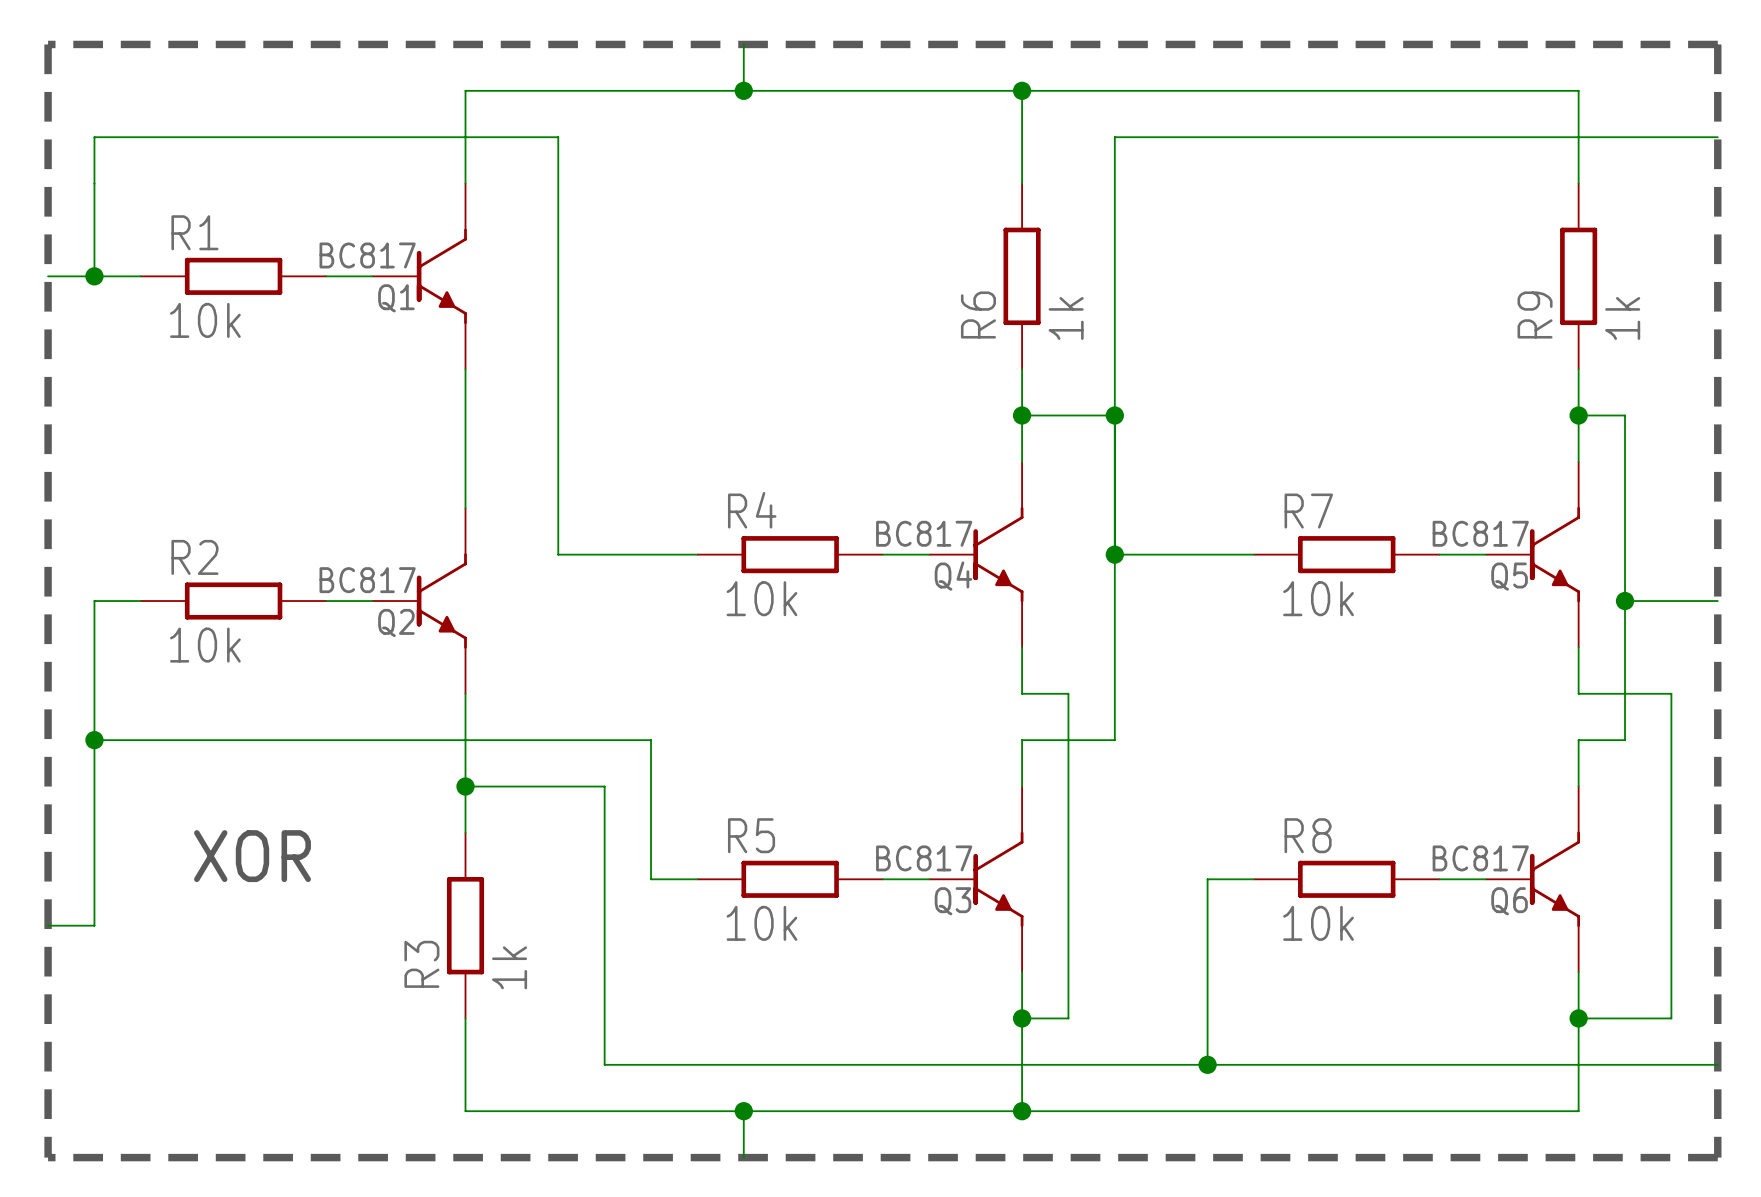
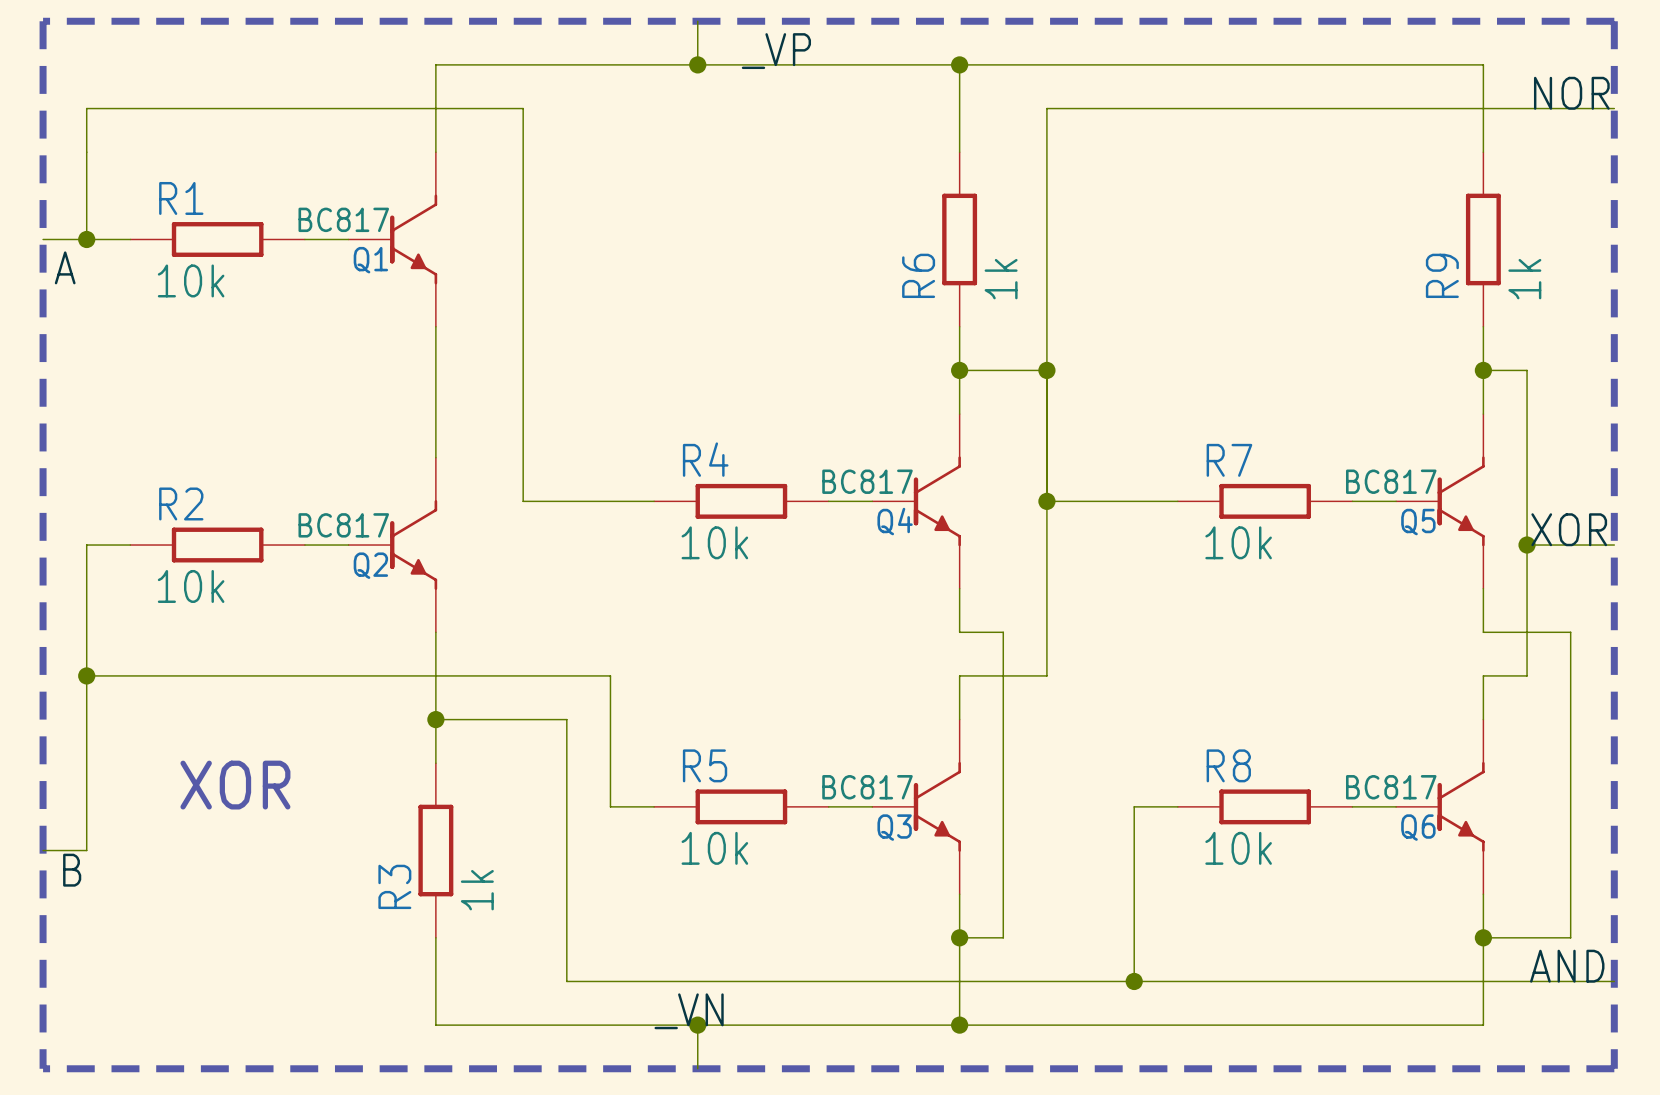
label: none -> _VP (776, 51)
label: none -> NOR (1571, 93)
label: none -> A (65, 267)
label: none -> XOR (1569, 529)
label: none -> B (72, 870)
label: none -> AND (1567, 966)
label: none -> _VN (689, 1011)

